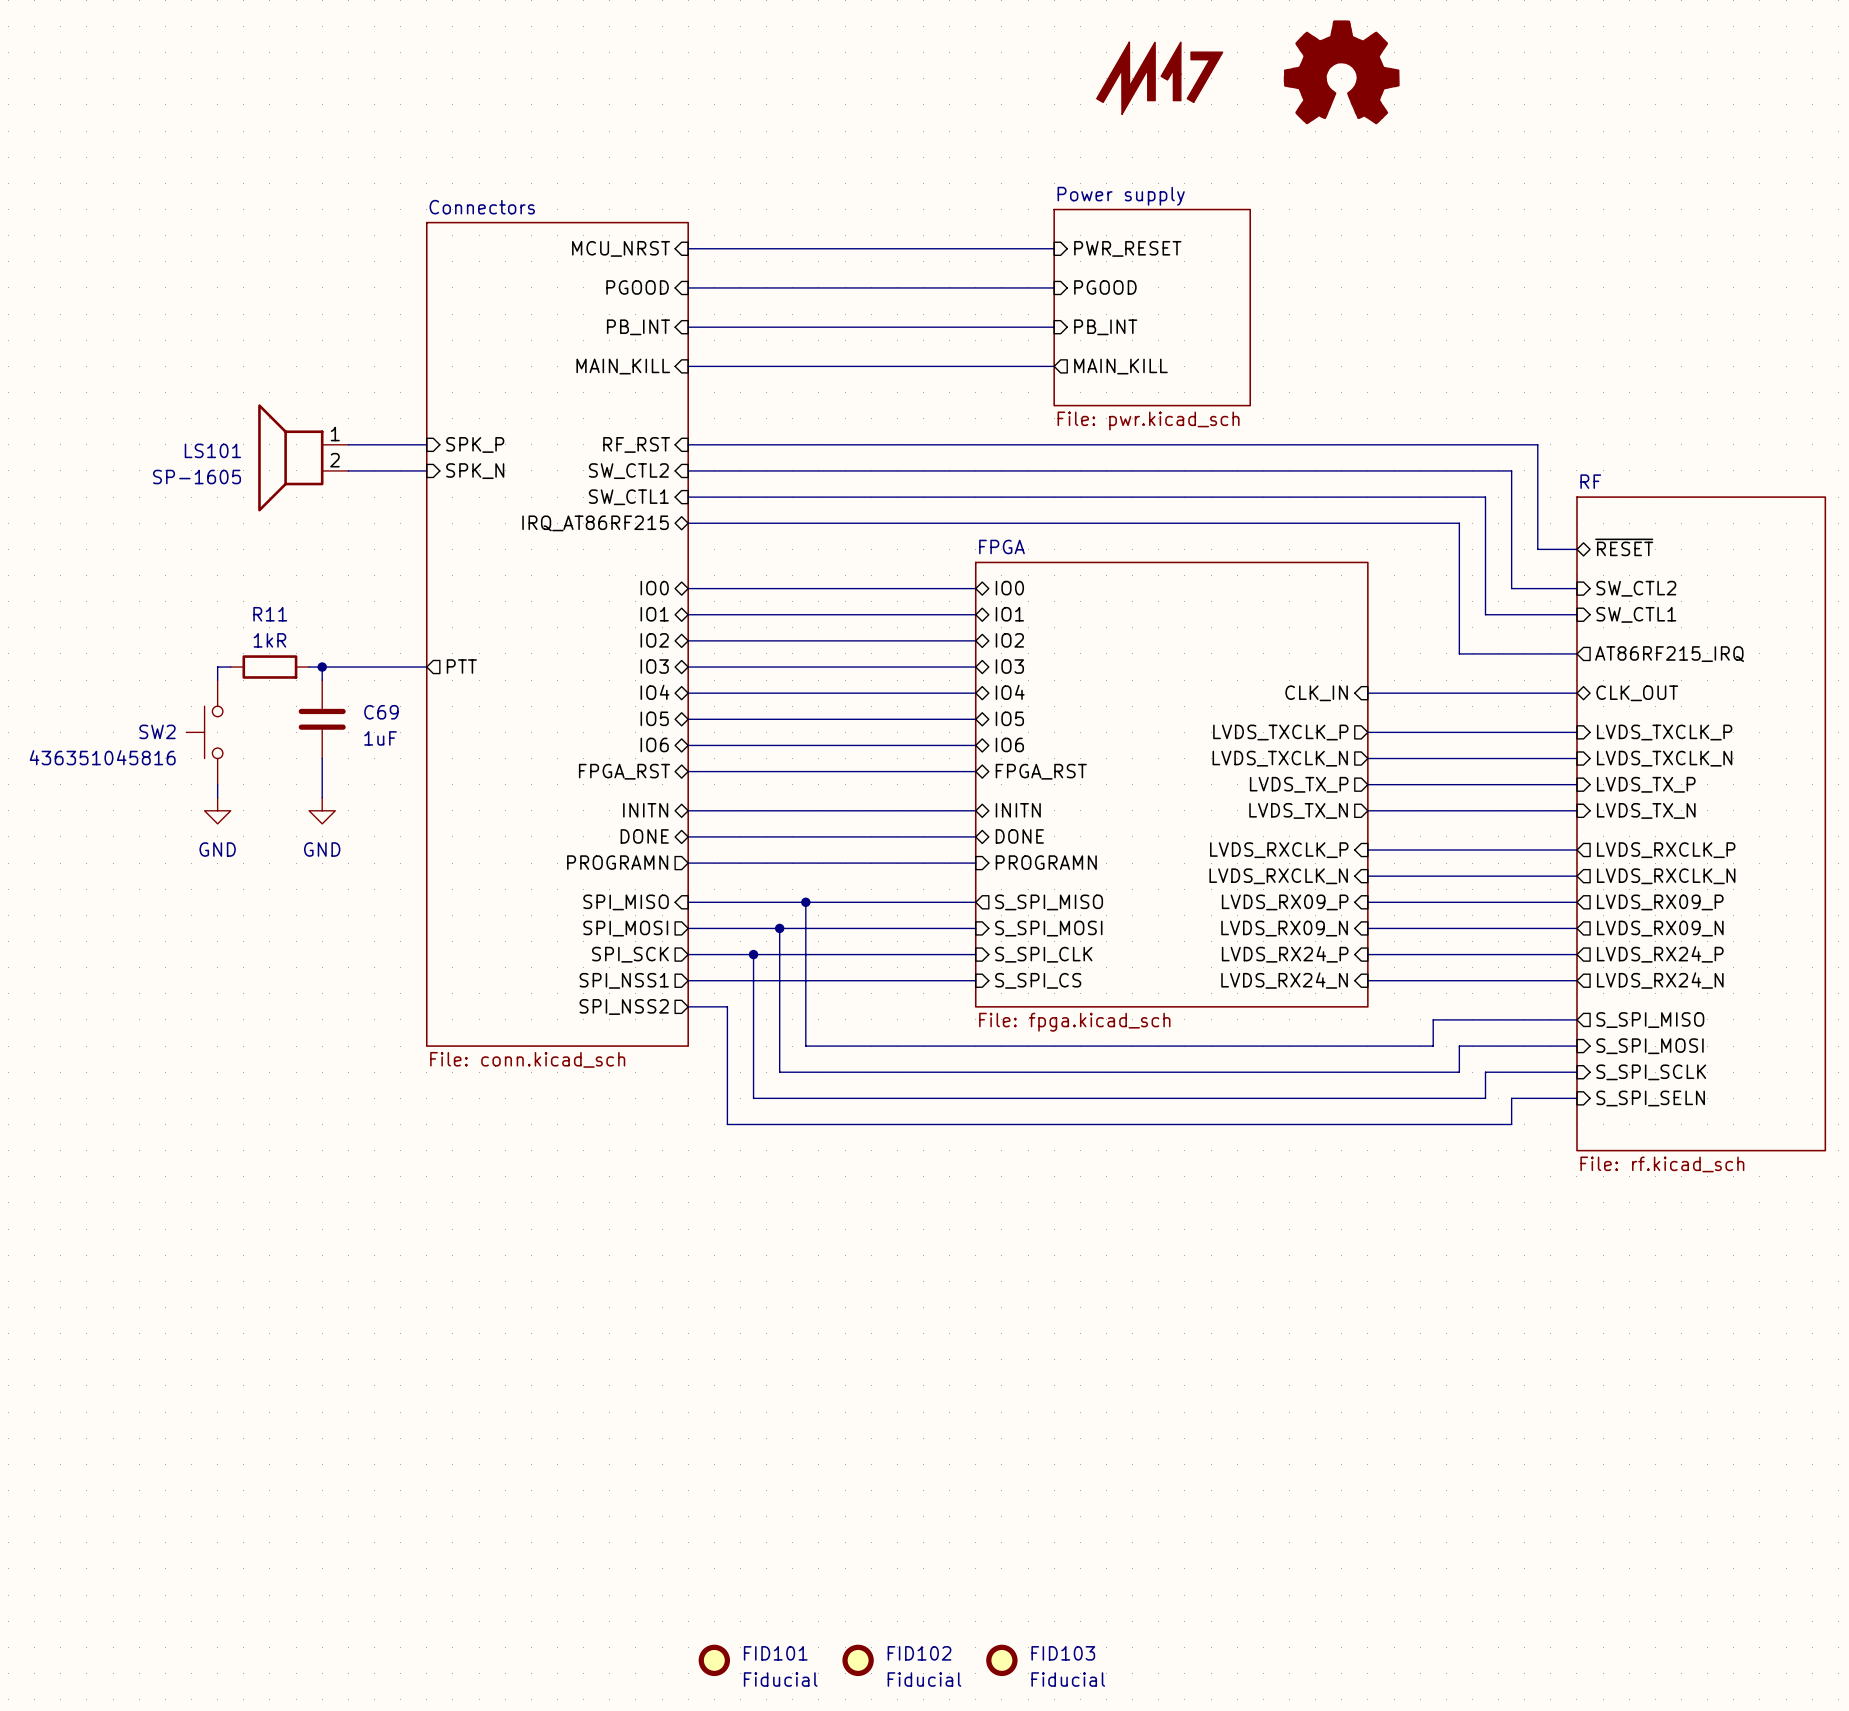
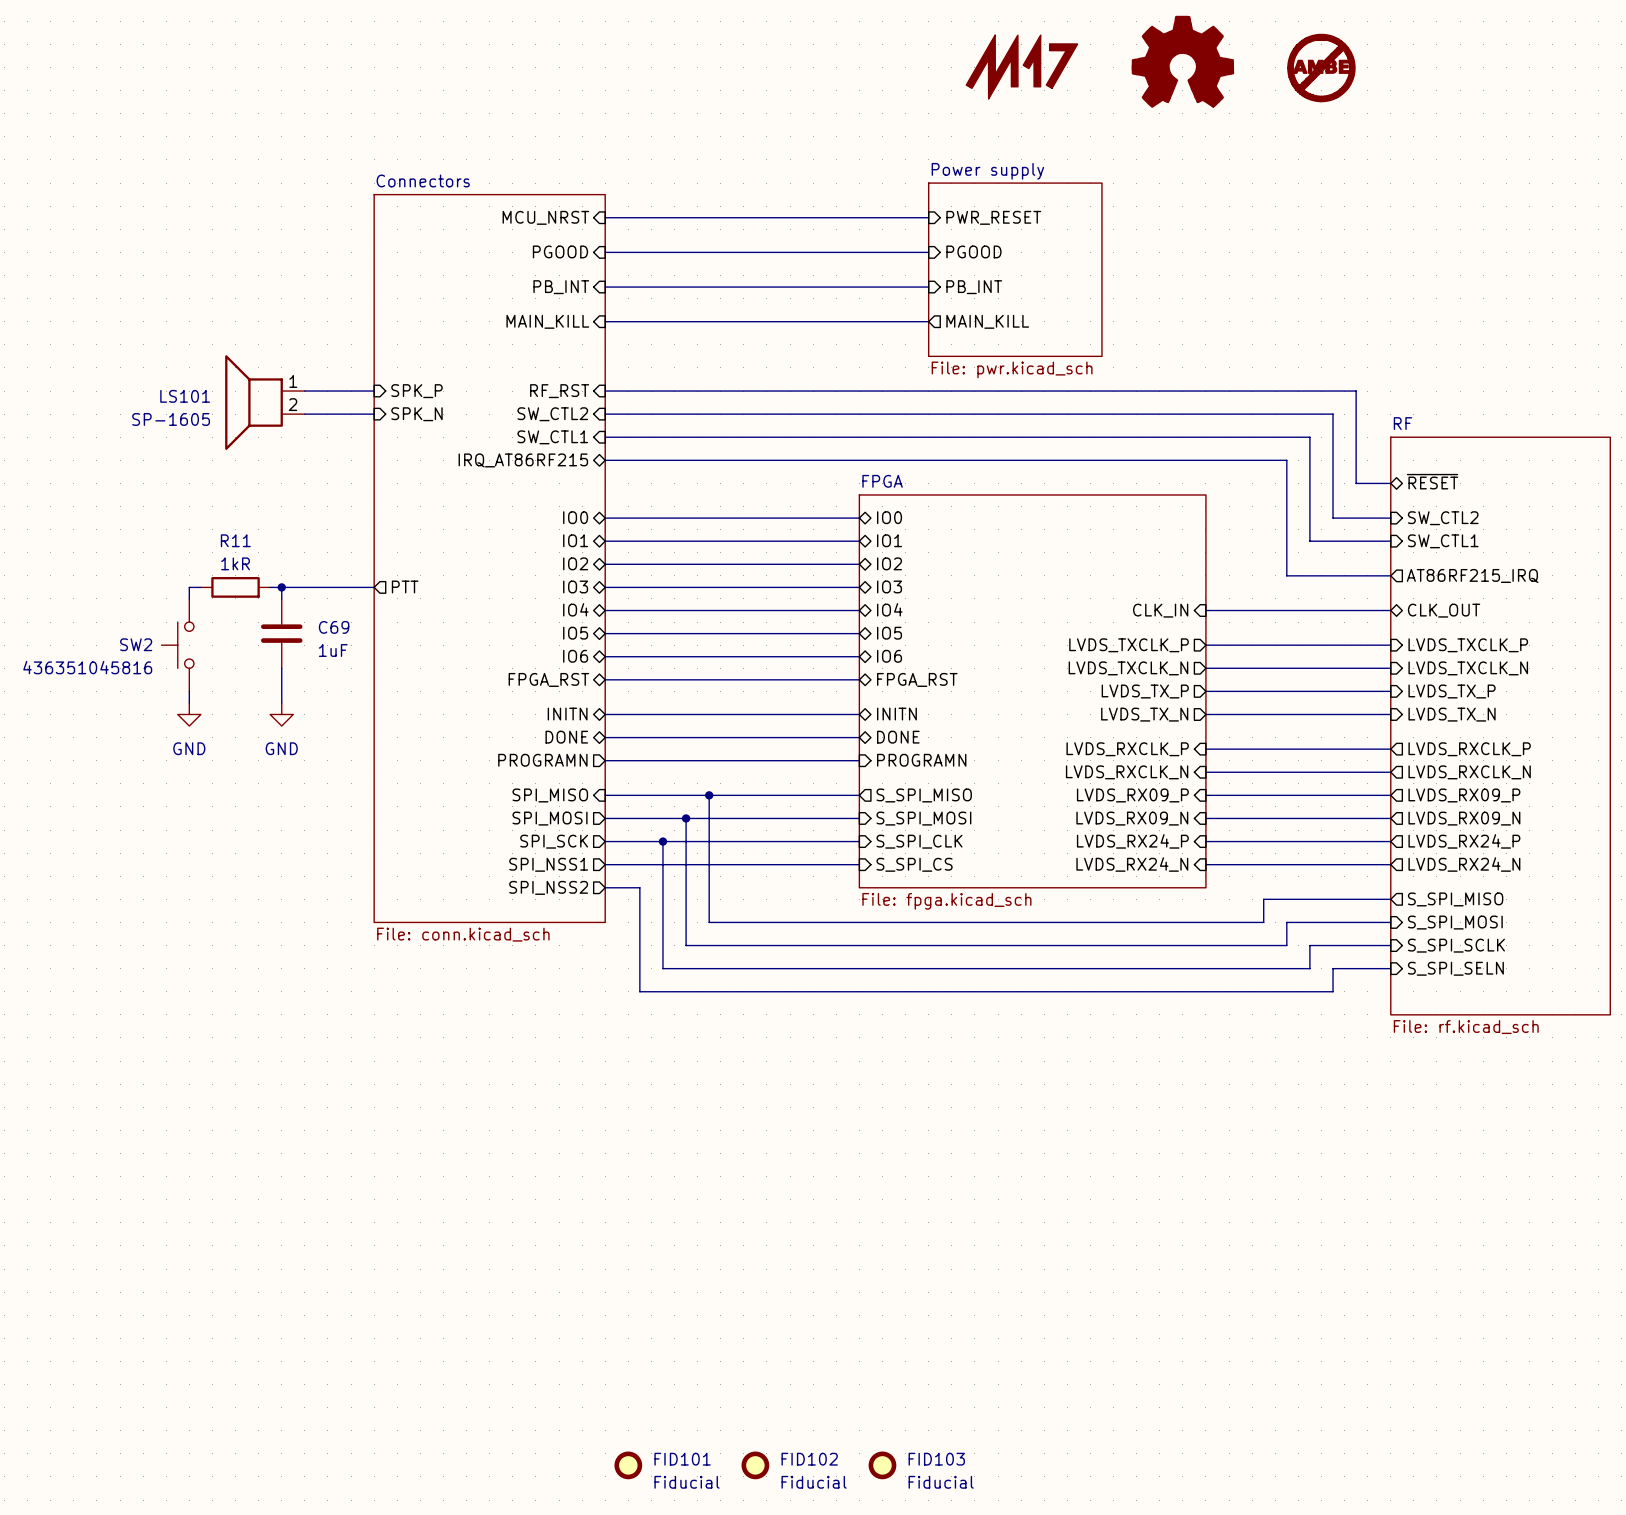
power symbol: none -> (1321, 68)

